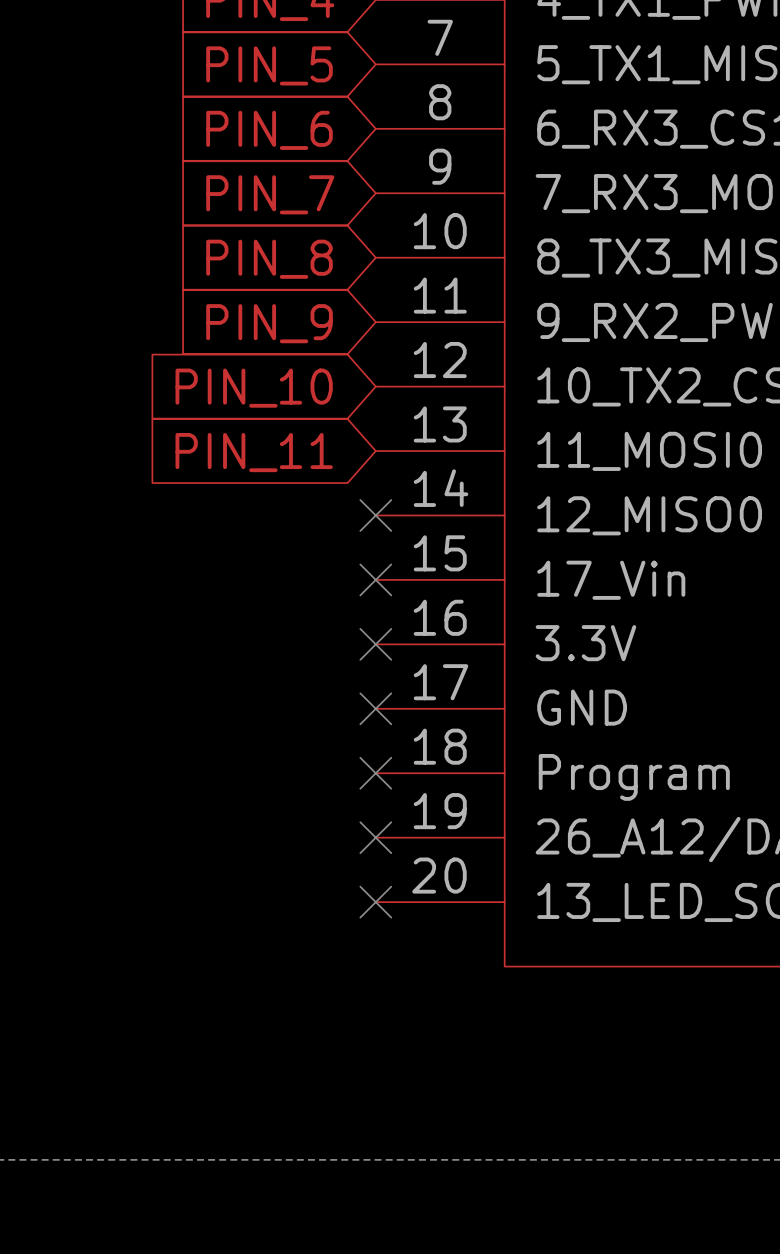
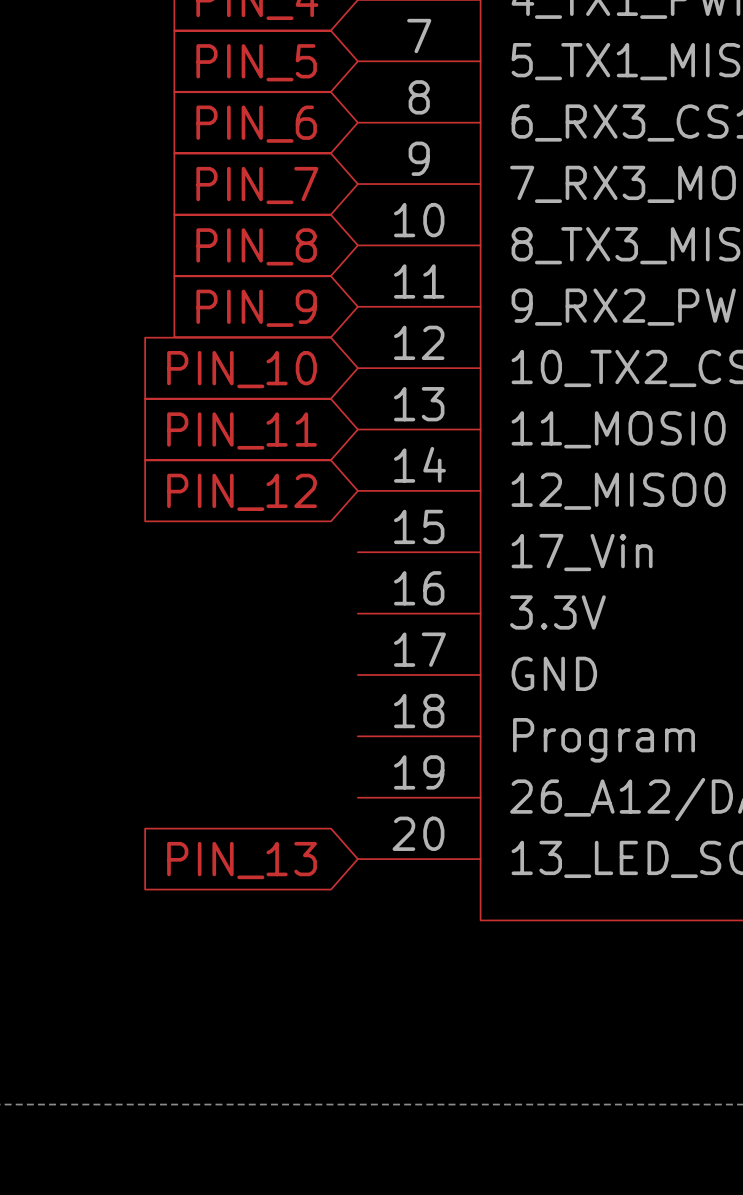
no-connect mark: (375, 515) -> none
global label: none -> PIN_12 (242, 492)
no-connect mark: (375, 579) -> none
no-connect mark: (375, 644) -> none
no-connect mark: (375, 708) -> none
no-connect mark: (375, 773) -> none
no-connect mark: (375, 837) -> none
no-connect mark: (375, 902) -> none
global label: none -> PIN_13 (242, 860)

